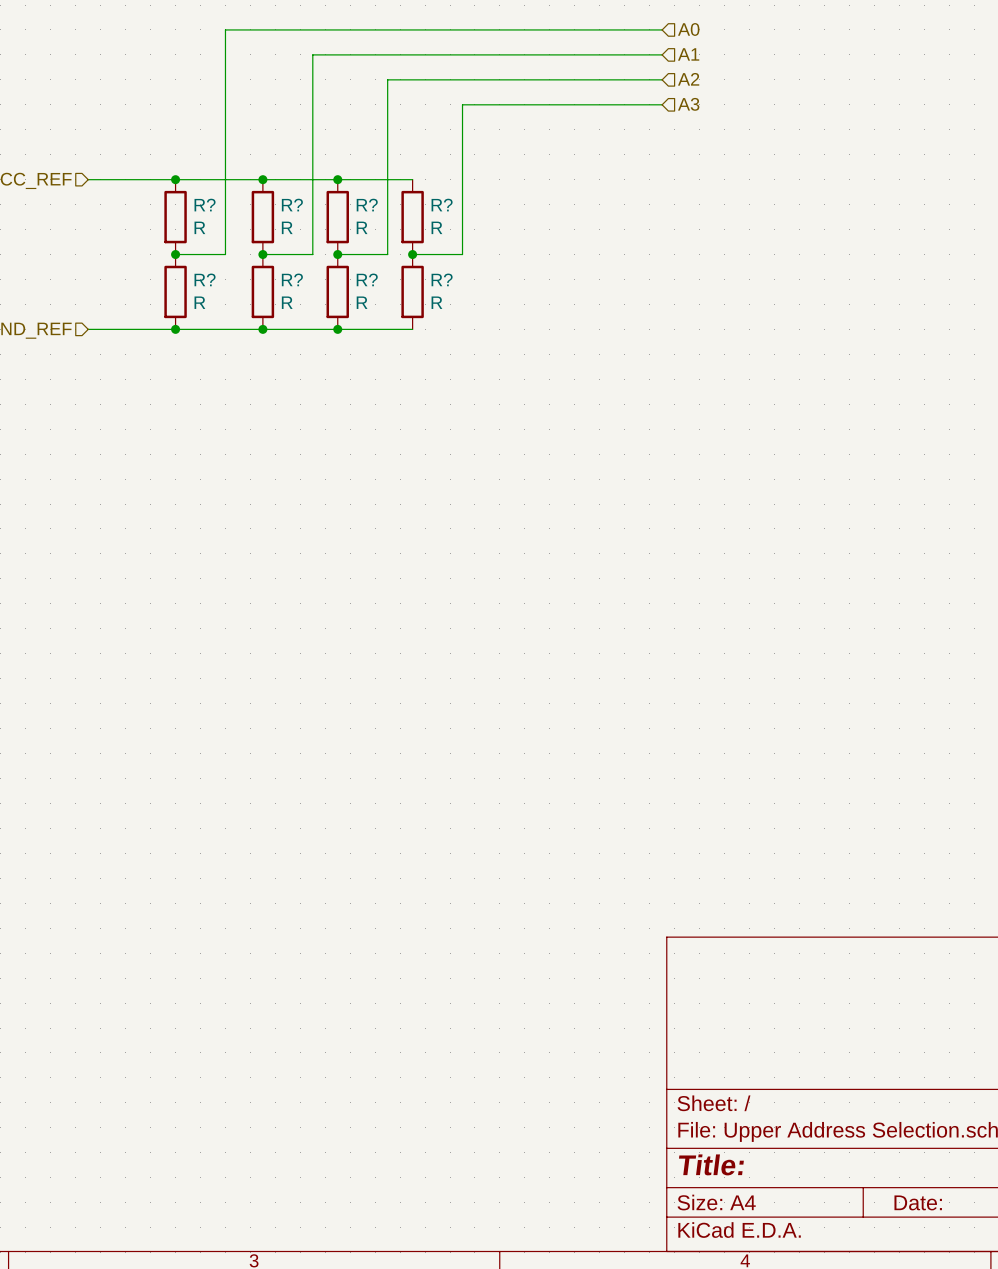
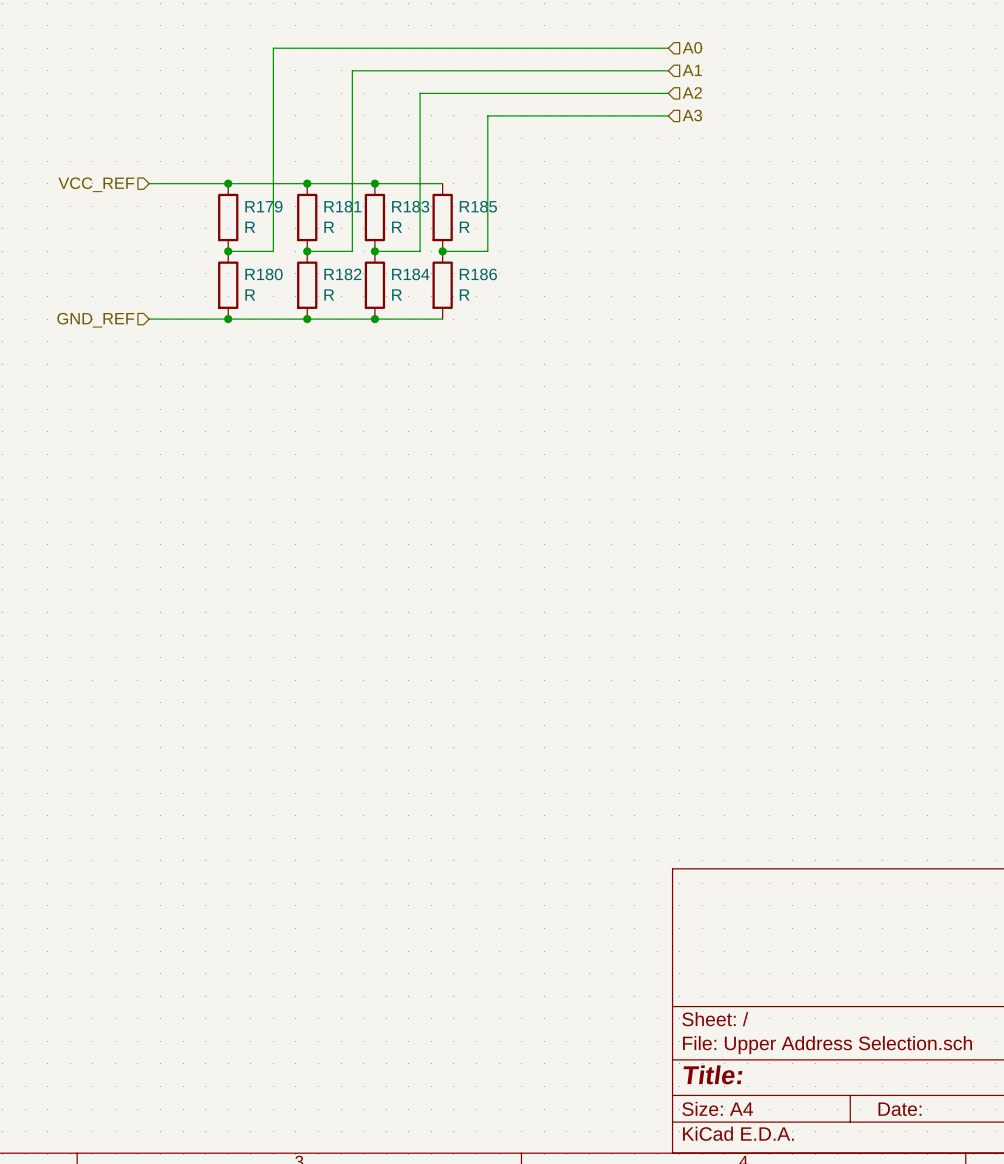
R? name: R? (205, 205) -> R179 (263, 206)
R? name: R? (292, 205) -> R181 (342, 206)
R? name: R? (367, 205) -> R183 (410, 206)
R? name: R? (442, 205) -> R185 (478, 206)
R? name: R? (205, 279) -> R180 (263, 274)
R? name: R? (292, 279) -> R182 (342, 274)
R? name: R? (367, 279) -> R184 (410, 274)
R? name: R? (442, 279) -> R186 (478, 274)

